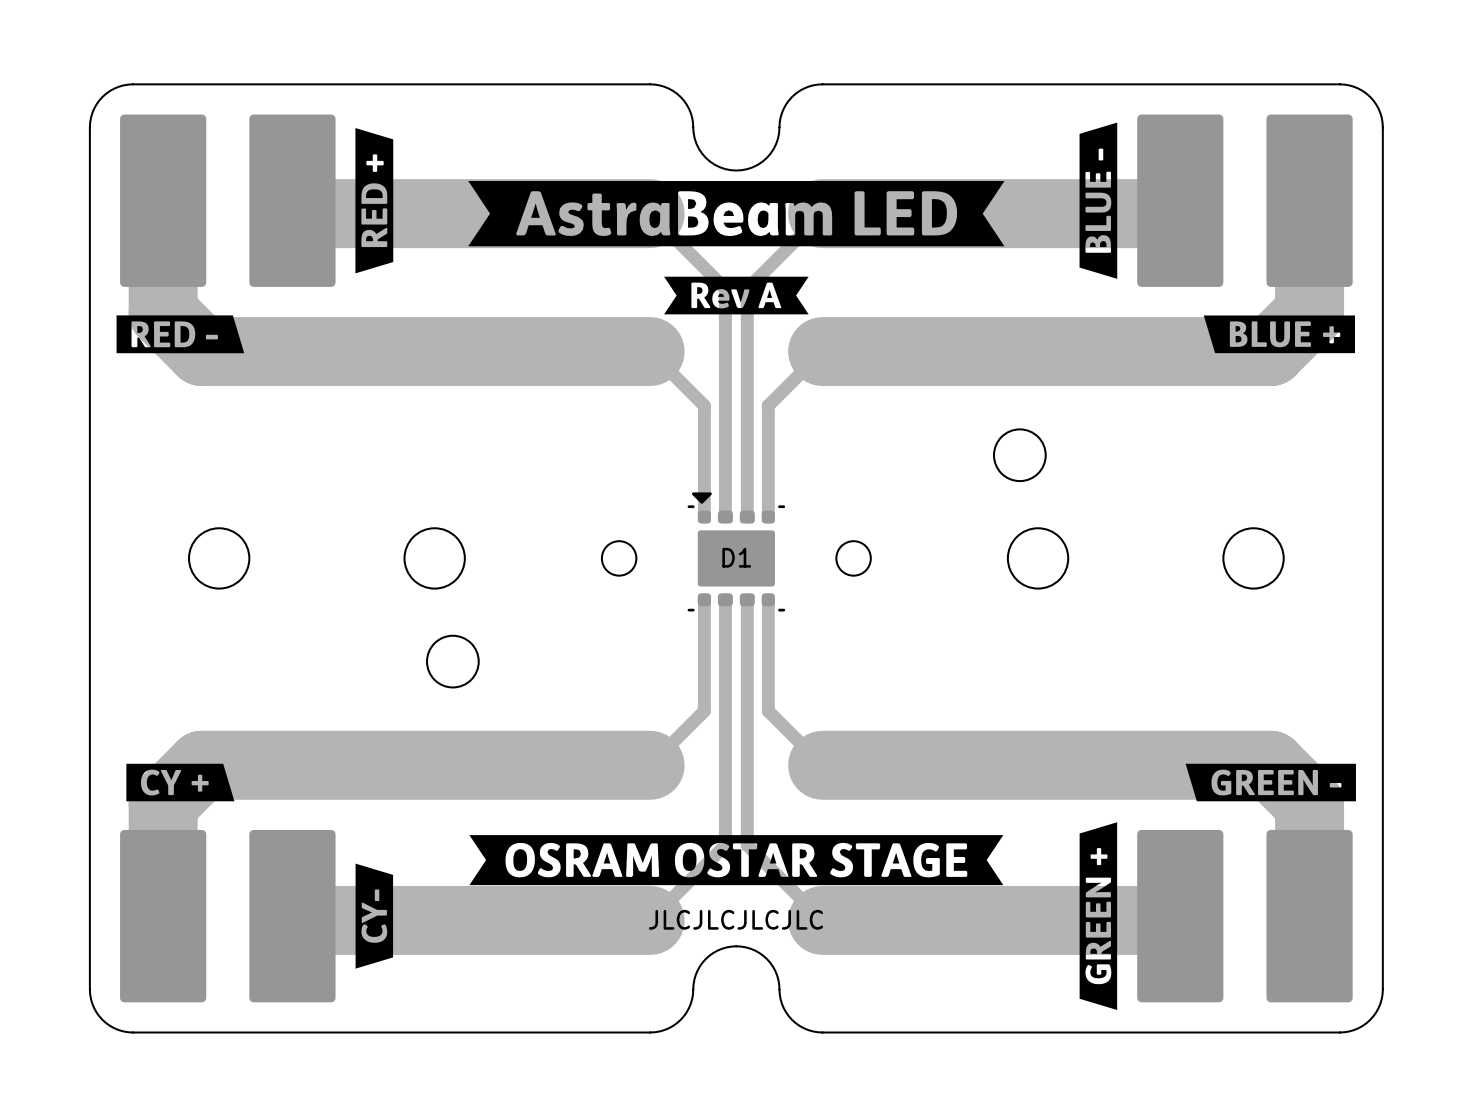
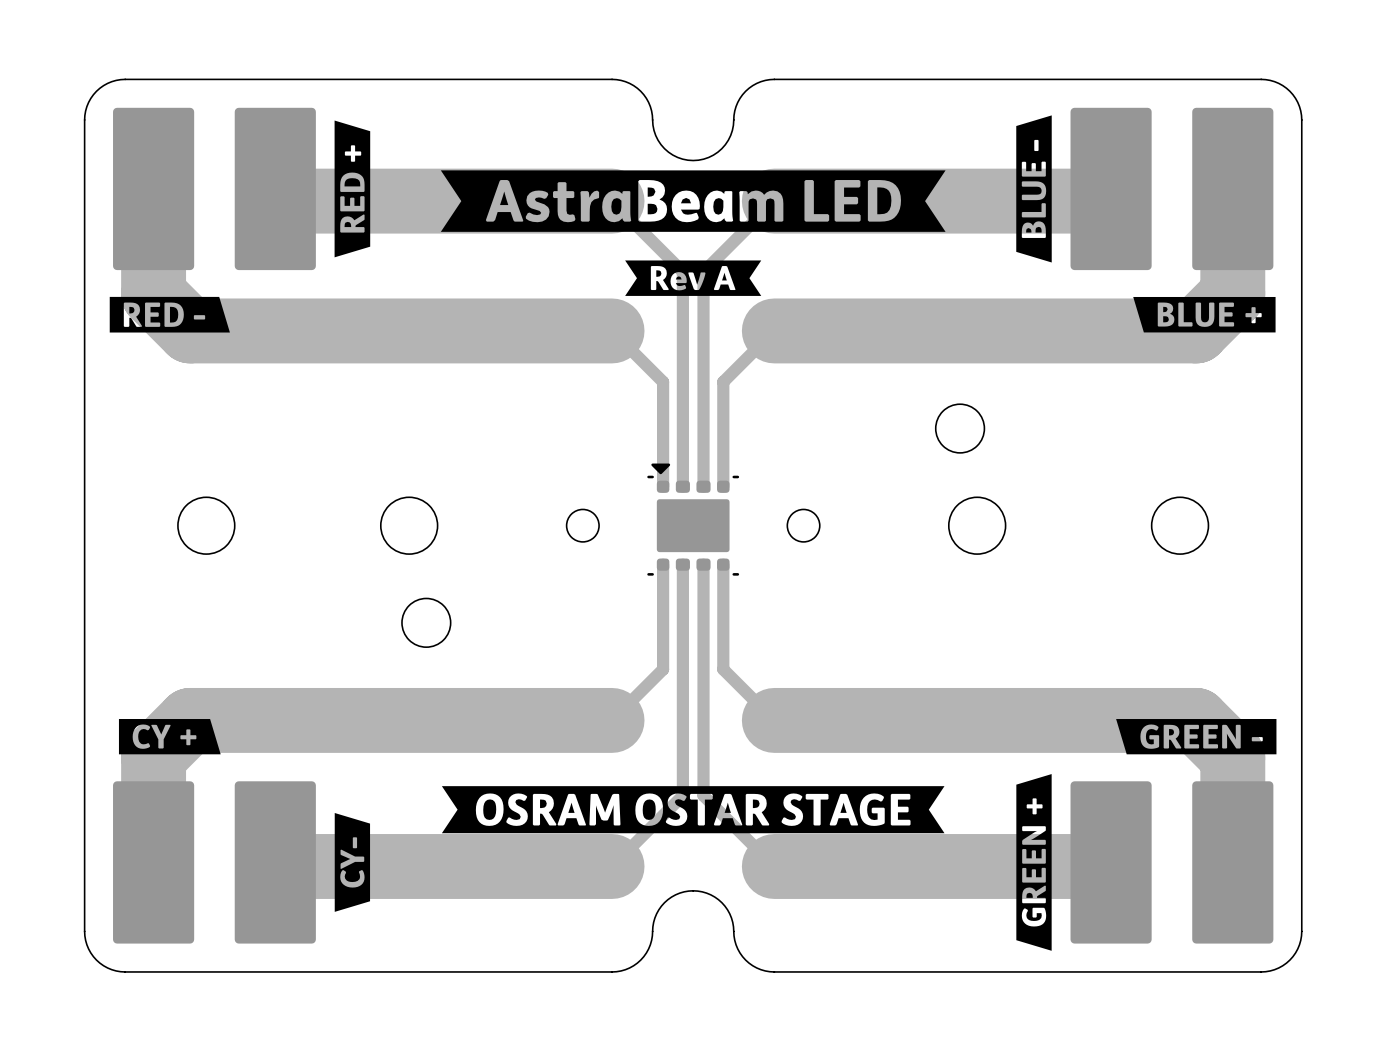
D1 name: D1 (736, 557) -> none
text: JLCJLCJLCJLC (735, 919) -> none

